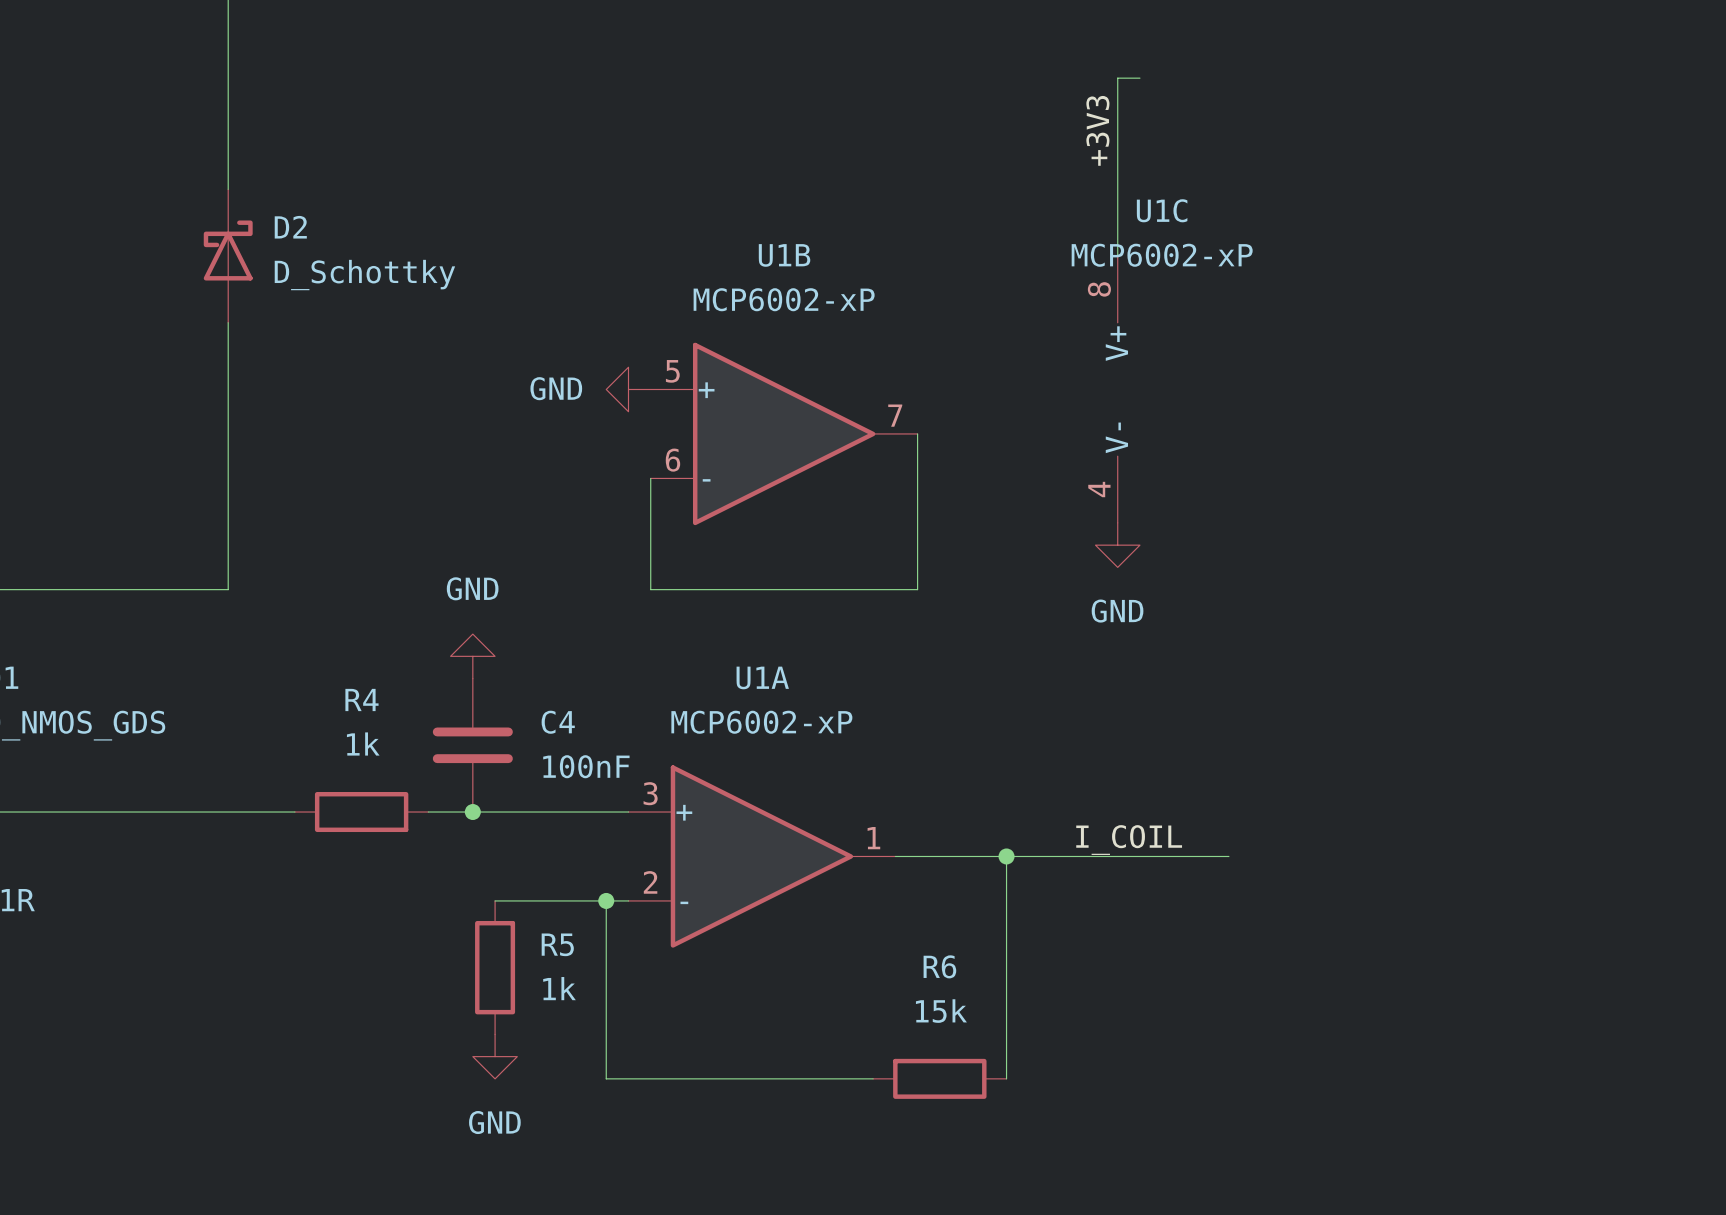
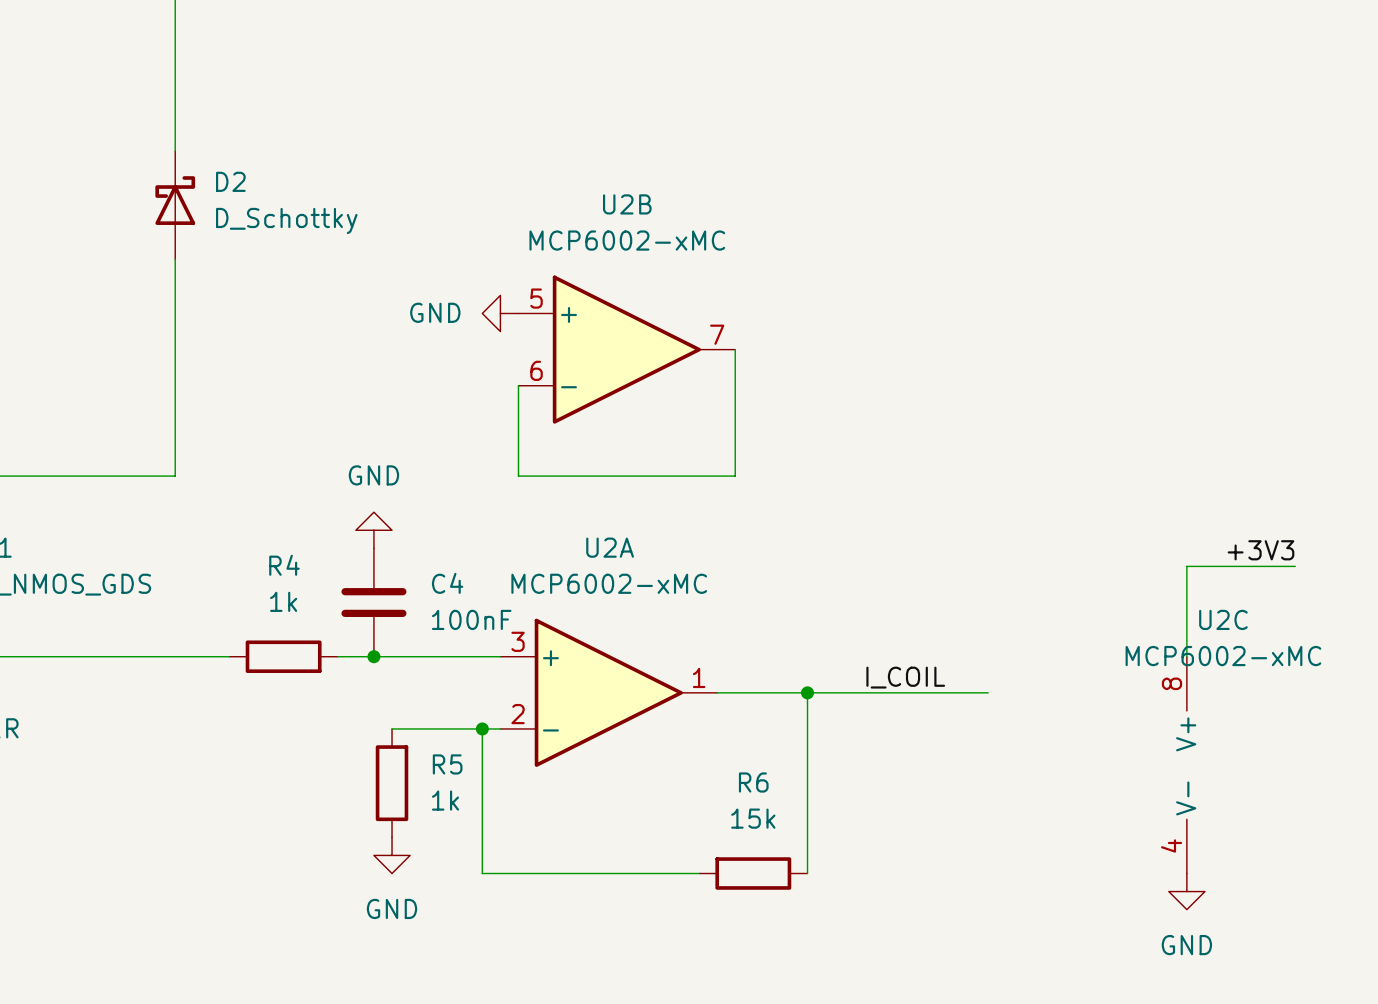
wire: (1139, 78) (1117, 78) (1117, 256) -> none
label: +3V3 (1097, 130) -> none
U1B name: U1B (784, 255) -> U2B (627, 204)
U1B value: MCP6002-xP (784, 299) -> MCP6002-xMC (627, 240)
U1C: MCP6002-xP (1117, 389) -> none
power symbol: GND (1117, 545) -> none
U1A name: U1A (762, 677) -> U2A (610, 547)
label: none -> +3V3 (1261, 550)
wire: none -> (1295, 566) (1186, 566) (1186, 656)
U1A value: MCP6002-xP (761, 722) -> MCP6002-xMC (609, 583)
U2C: none -> MCP6002-xMC (1186, 765)
power symbol: none -> GND (1186, 891)

